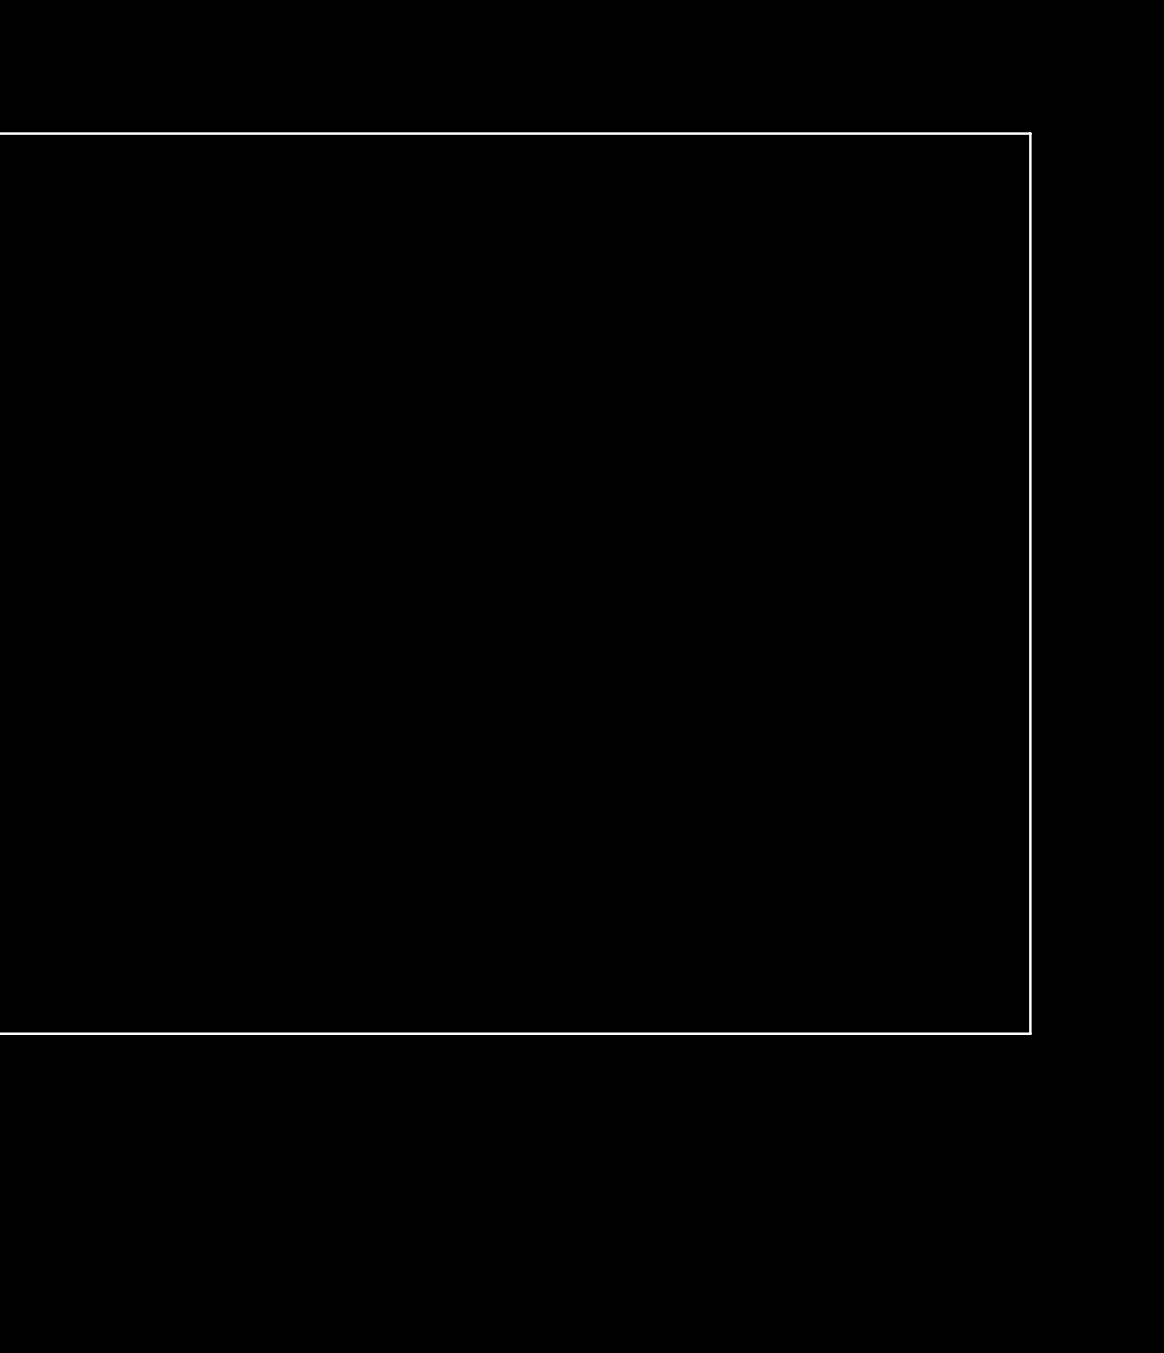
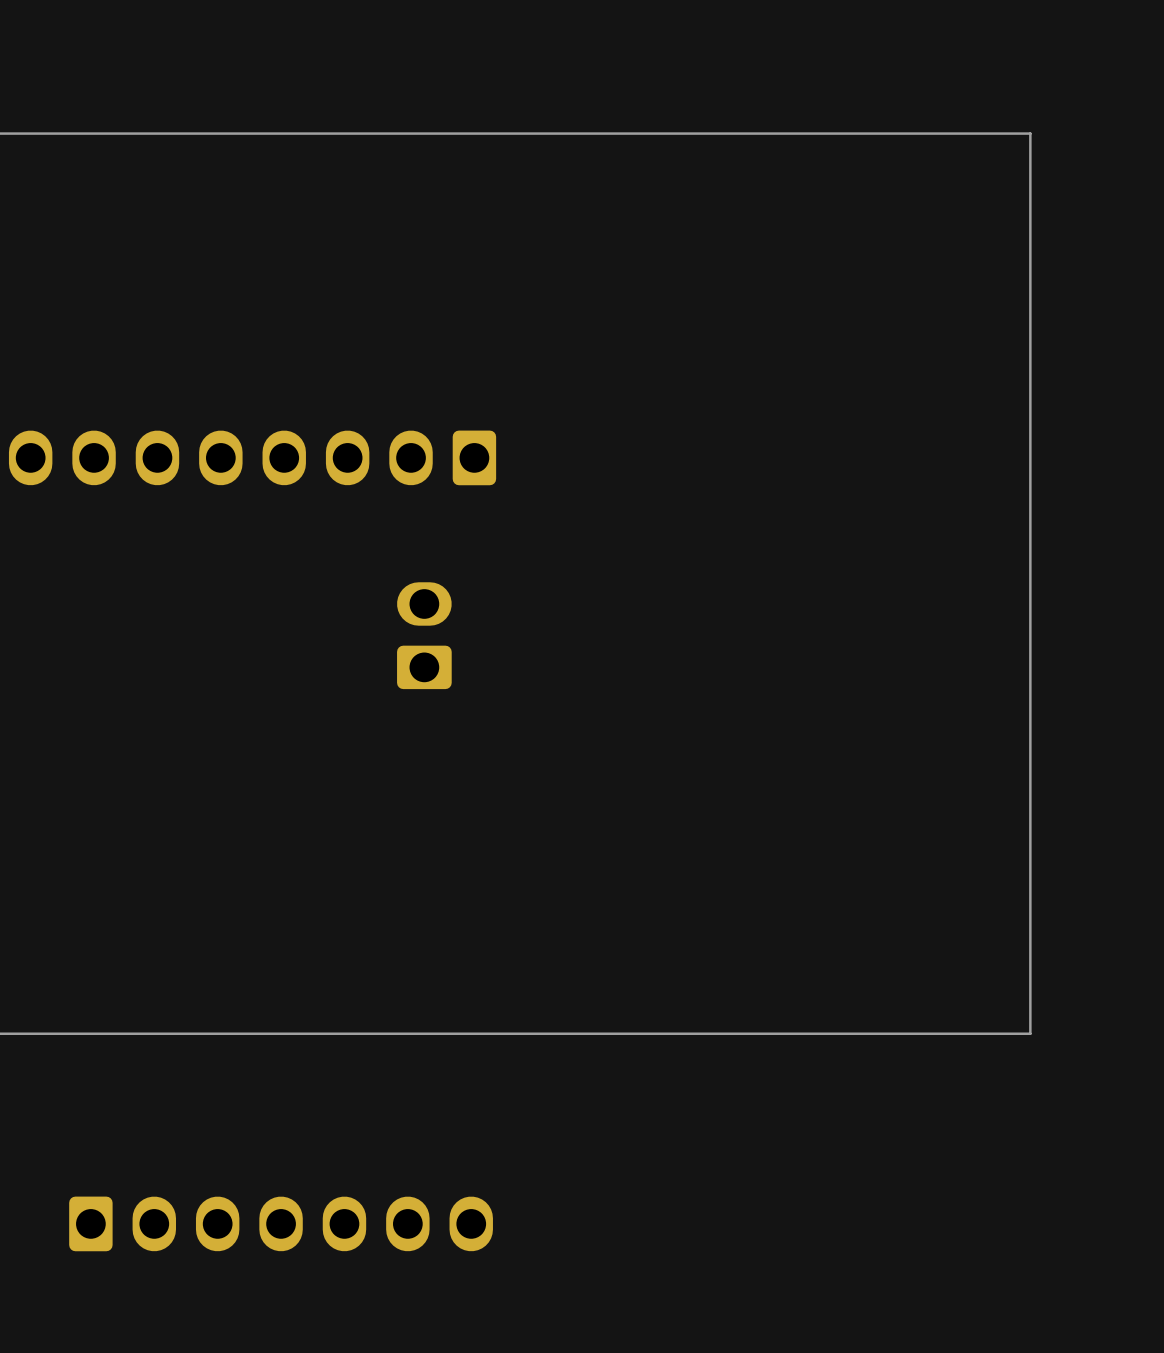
part: none -> (252, 457)
part: none -> (424, 635)
part: none -> (281, 1223)

